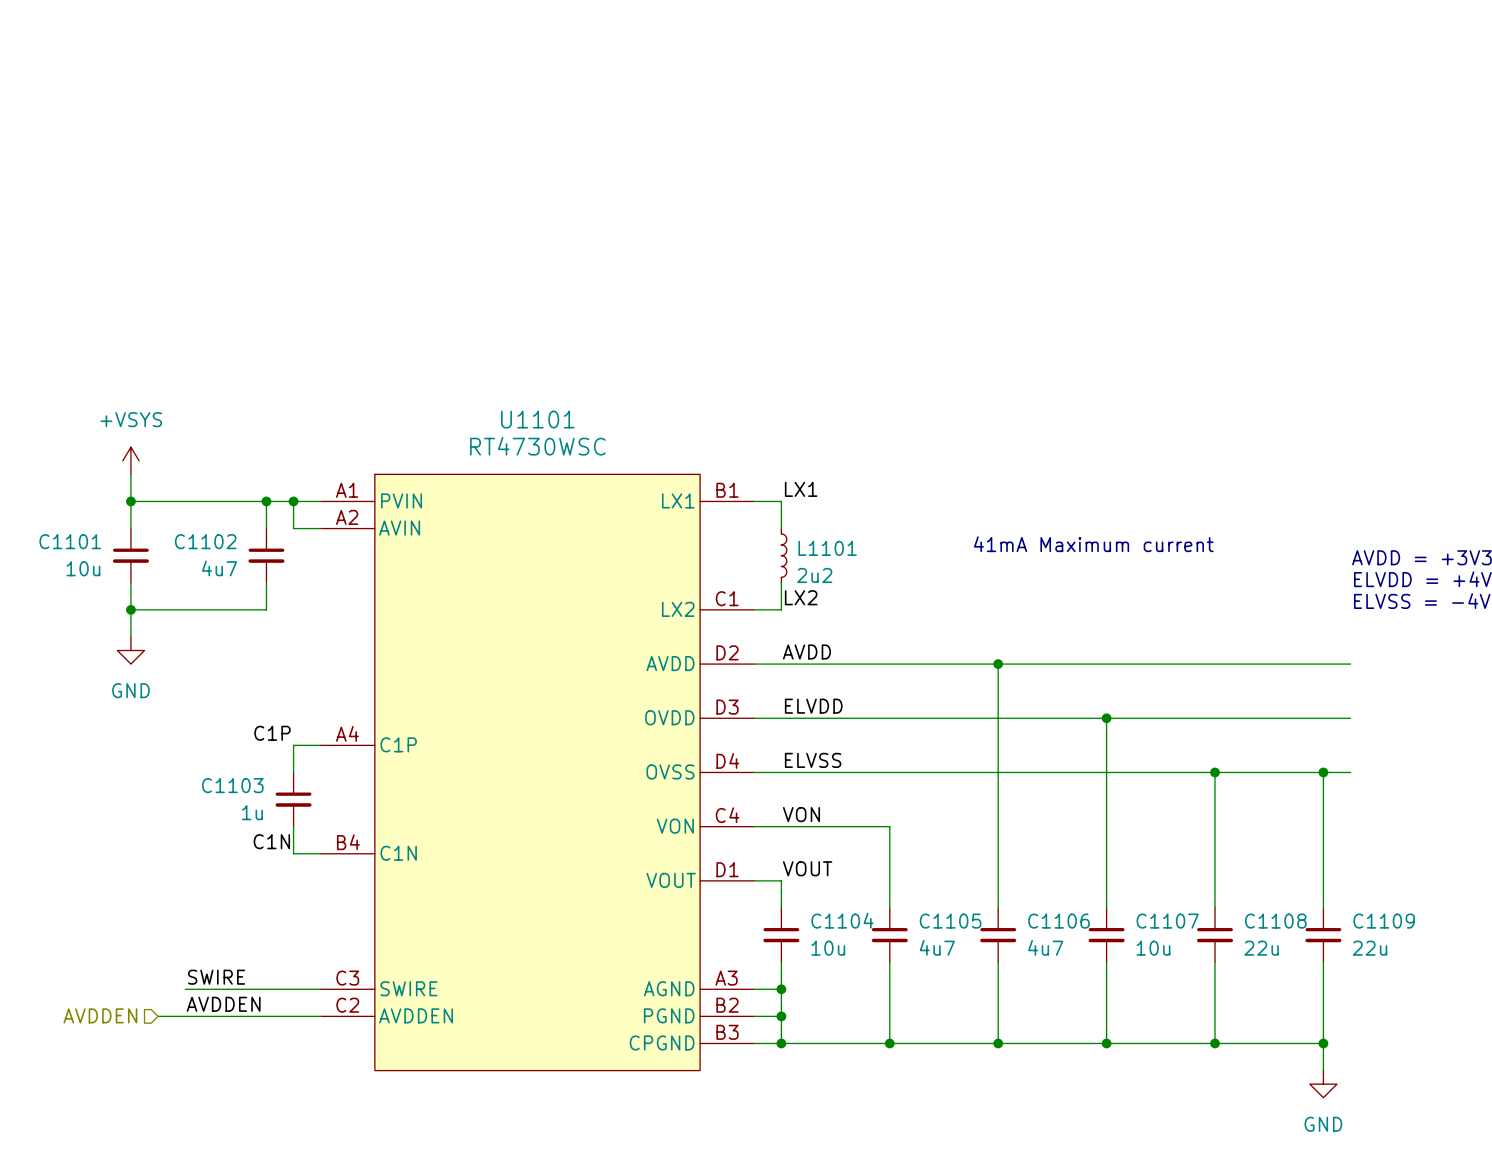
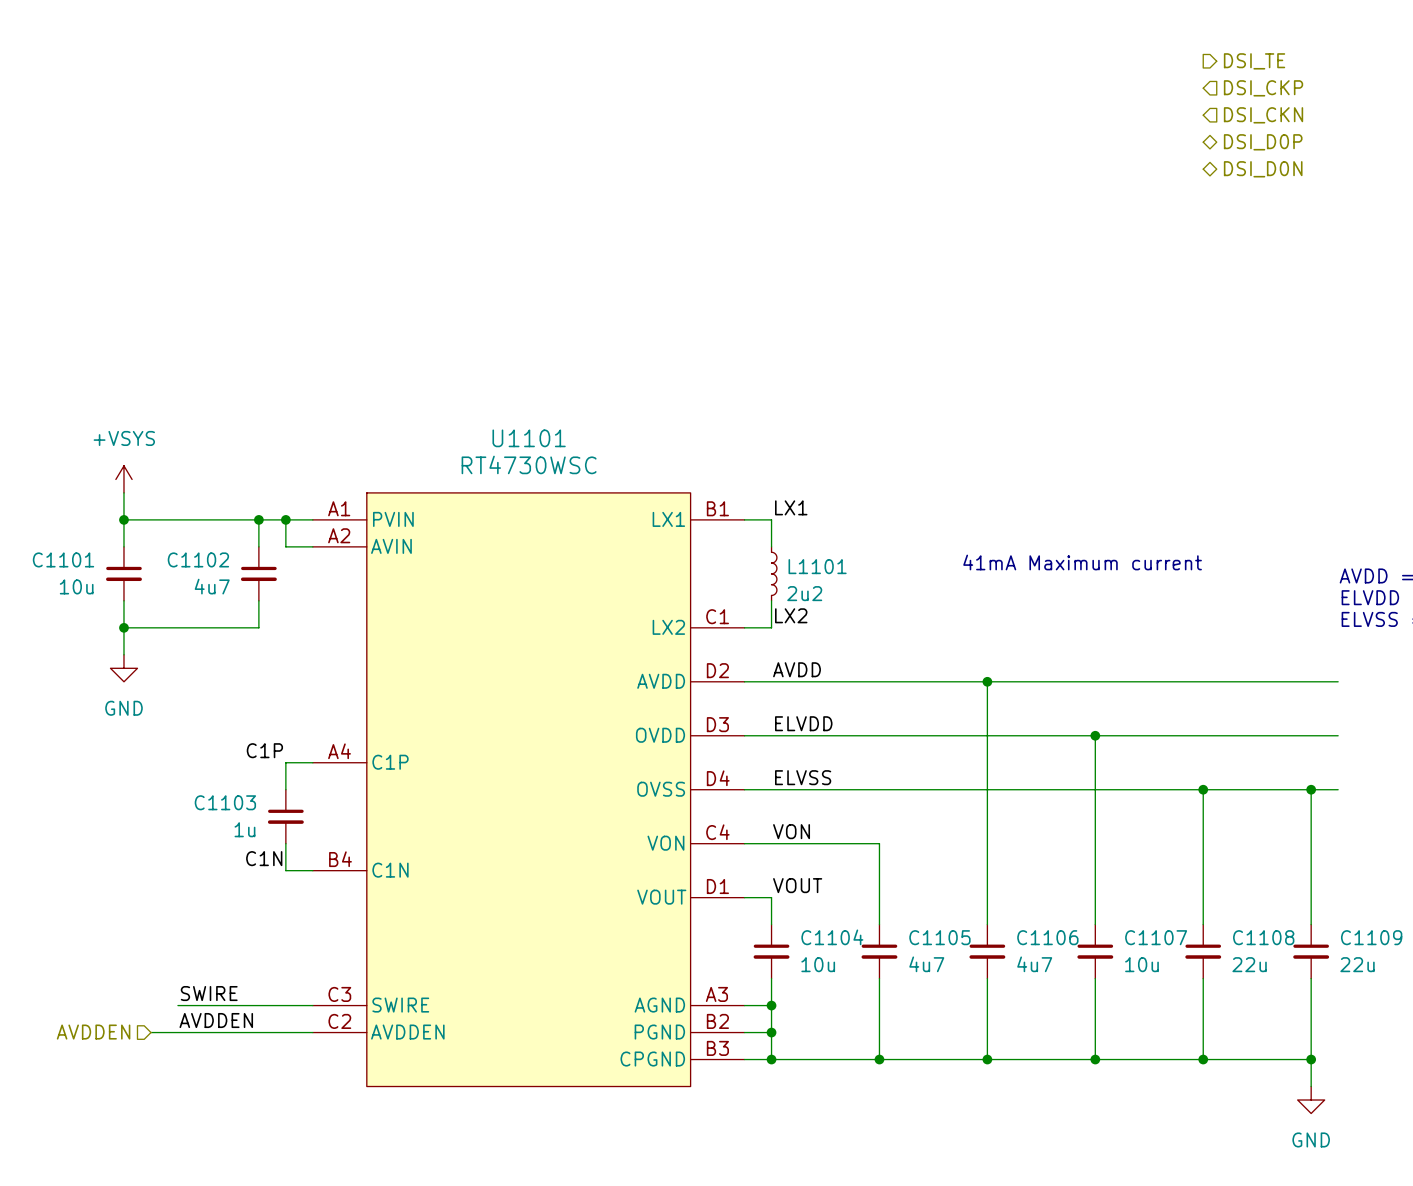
hierarchical label: none -> DSI_TE (1254, 61)
hierarchical label: none -> DSI_CKP (1263, 88)
hierarchical label: none -> DSI_CKN (1263, 115)
hierarchical label: none -> DSI_D0P (1263, 142)
hierarchical label: none -> DSI_D0N (1263, 169)

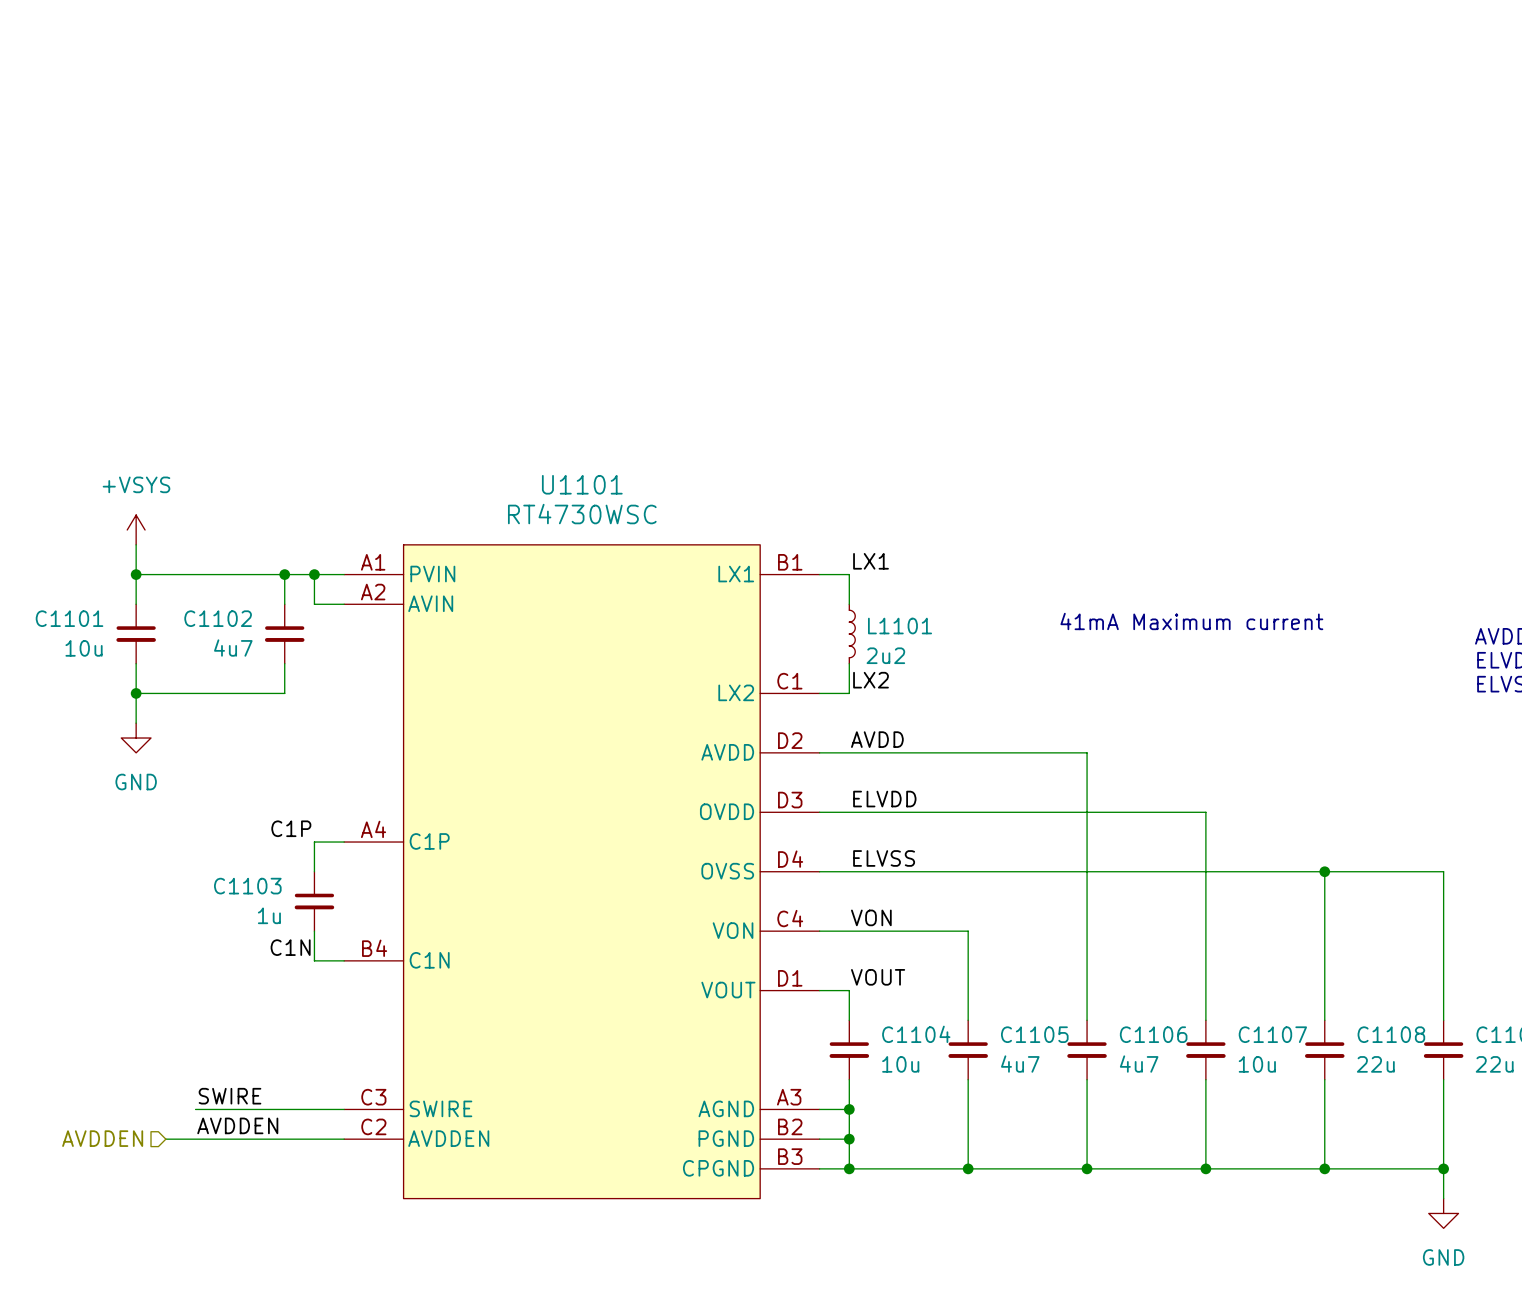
hierarchical label: DSI_TE (1254, 61) -> none
hierarchical label: DSI_CKP (1263, 88) -> none
hierarchical label: DSI_CKN (1263, 115) -> none
hierarchical label: DSI_D0P (1263, 142) -> none
hierarchical label: DSI_D0N (1263, 169) -> none
wire: (987, 681) (1338, 681) -> none
junction: (987, 681) -> none
wire: (1095, 735) (1338, 735) -> none
junction: (1095, 735) -> none
wire: (1311, 789) (1338, 789) -> none
junction: (1311, 789) -> none

